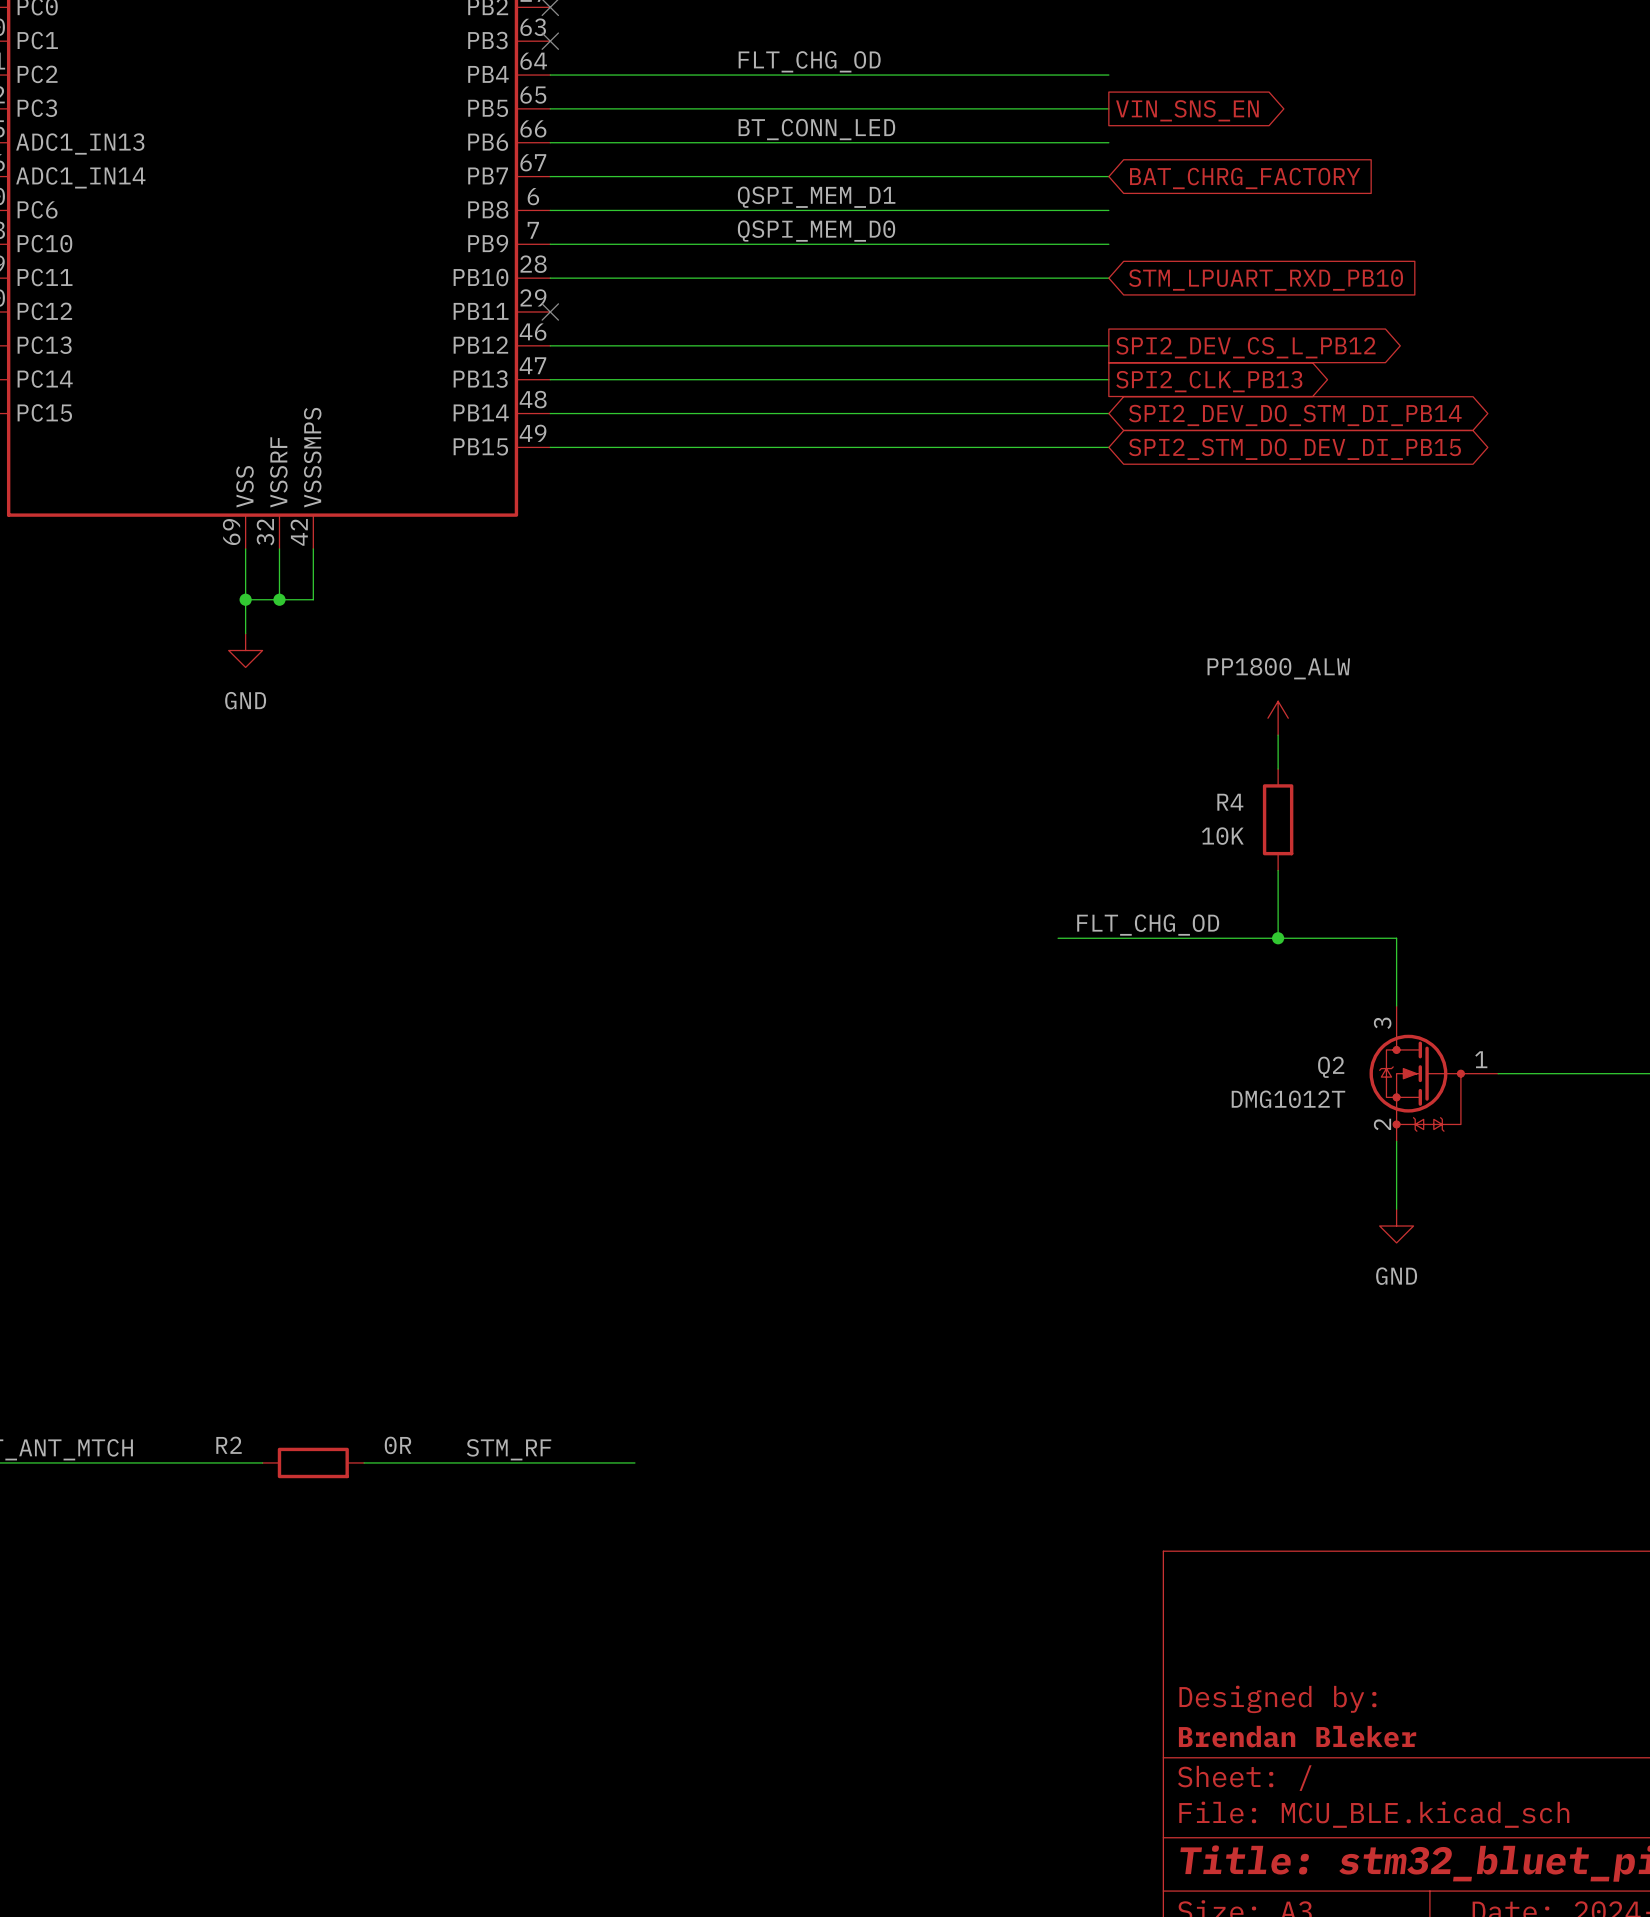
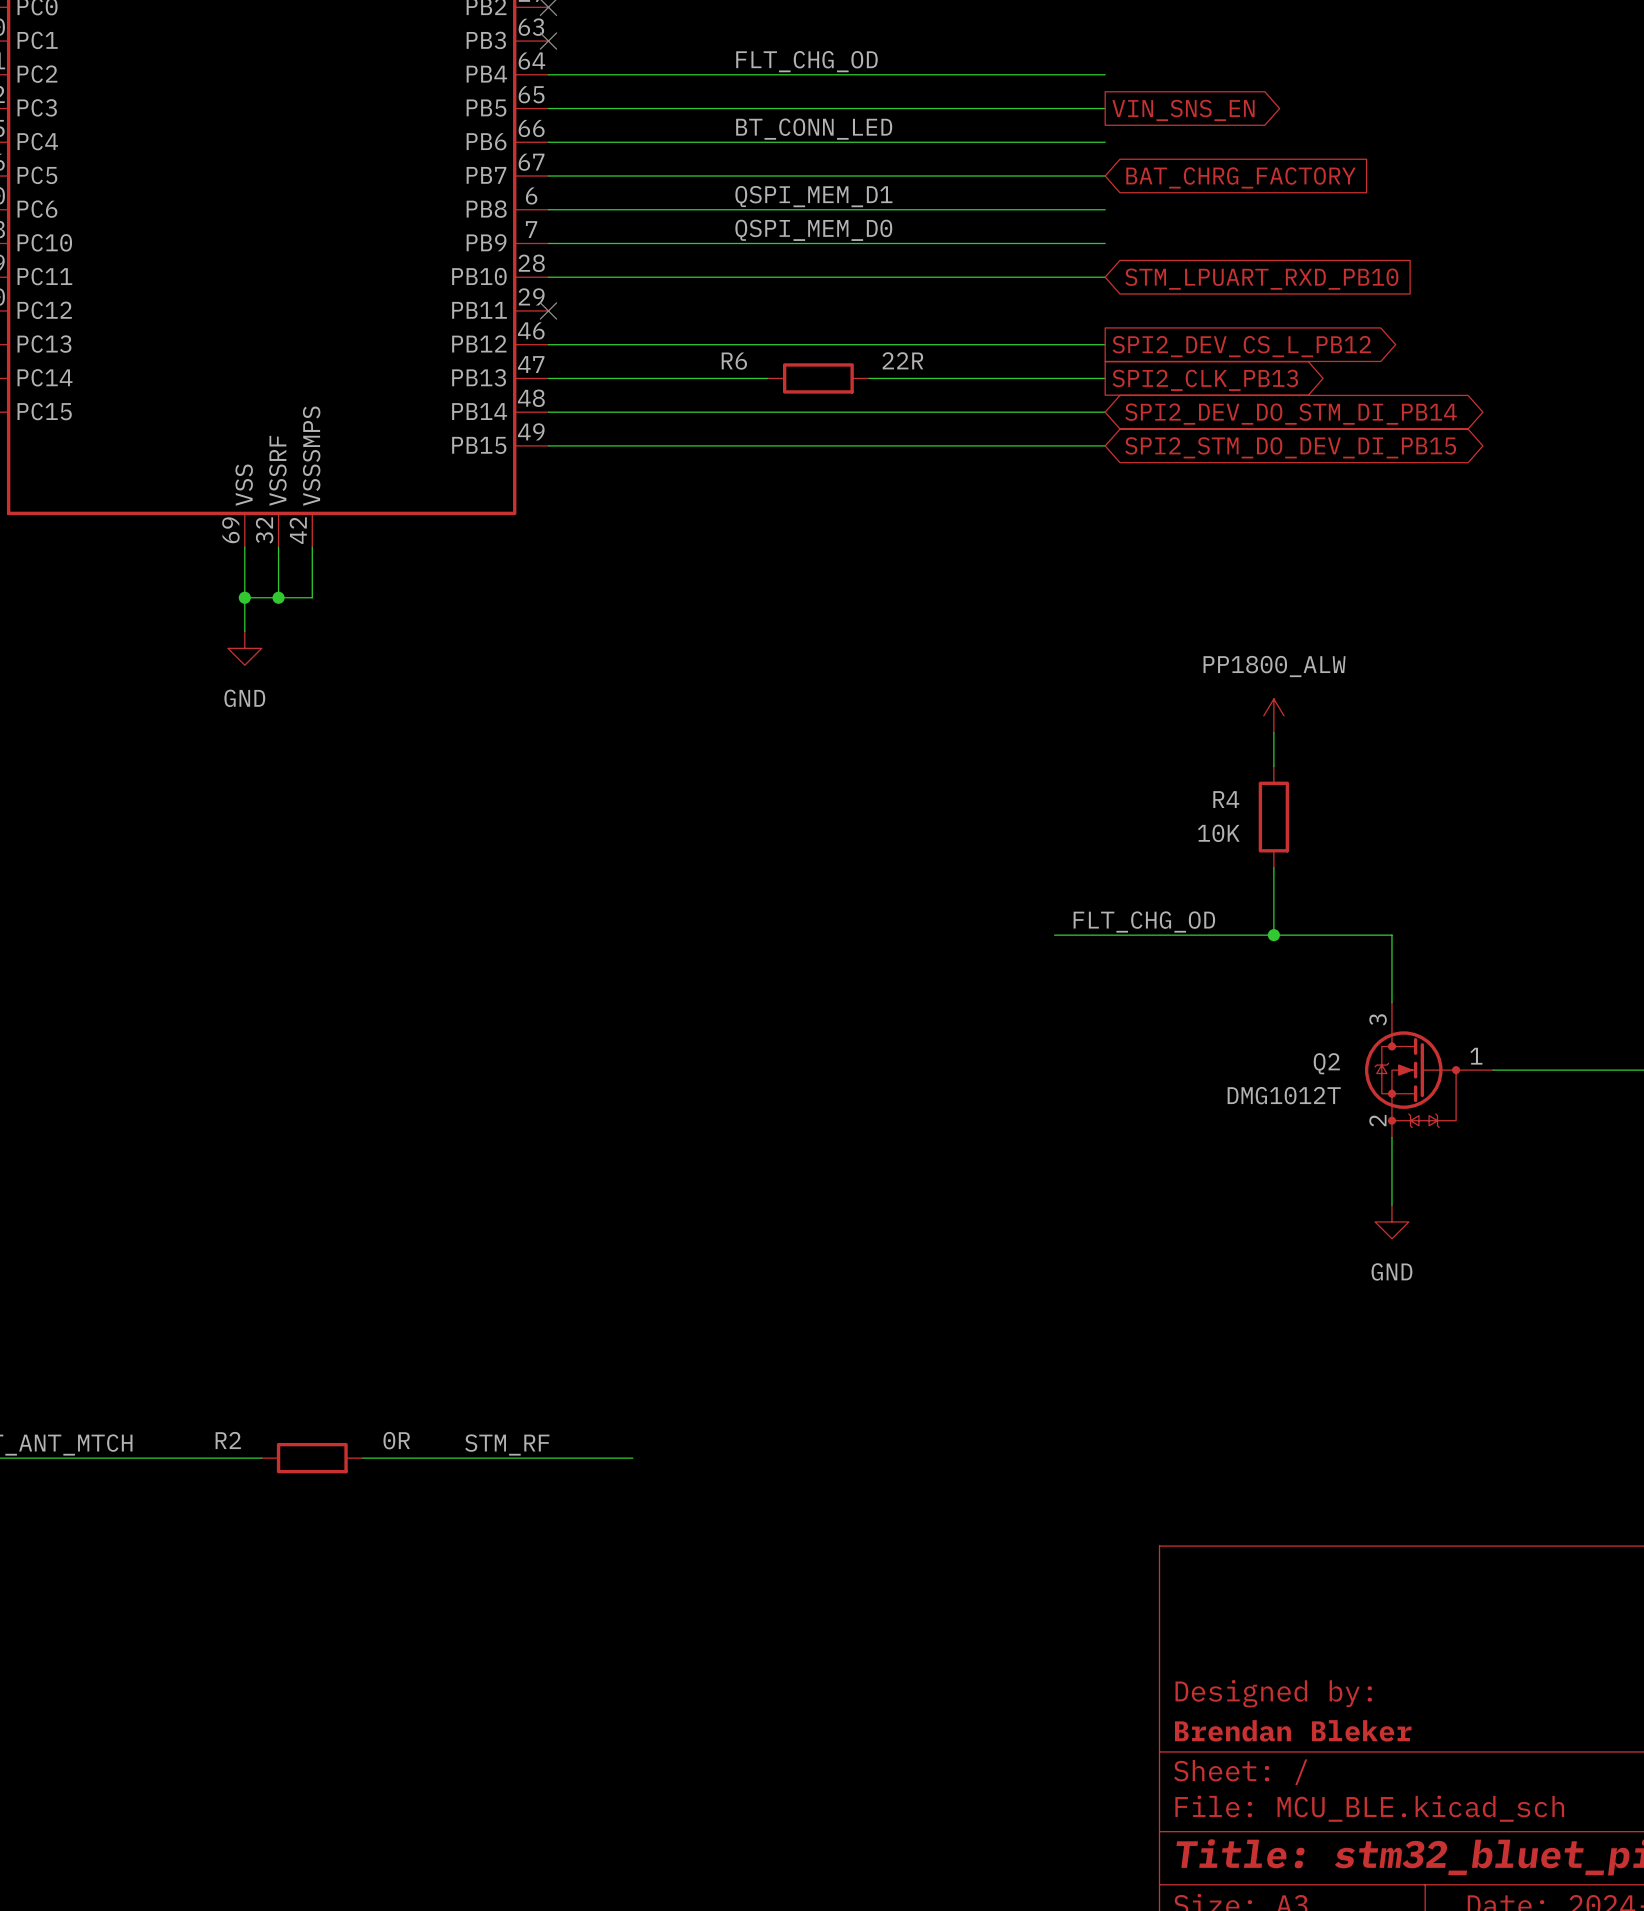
part pin name: ADC1_IN13 (80, 144) -> PC4 (37, 141)
part pin name: ADC1_IN14 (80, 177) -> PC5 (37, 175)
wire: (770, 379) (871, 379) -> none
R6: none -> 22R (818, 378)

